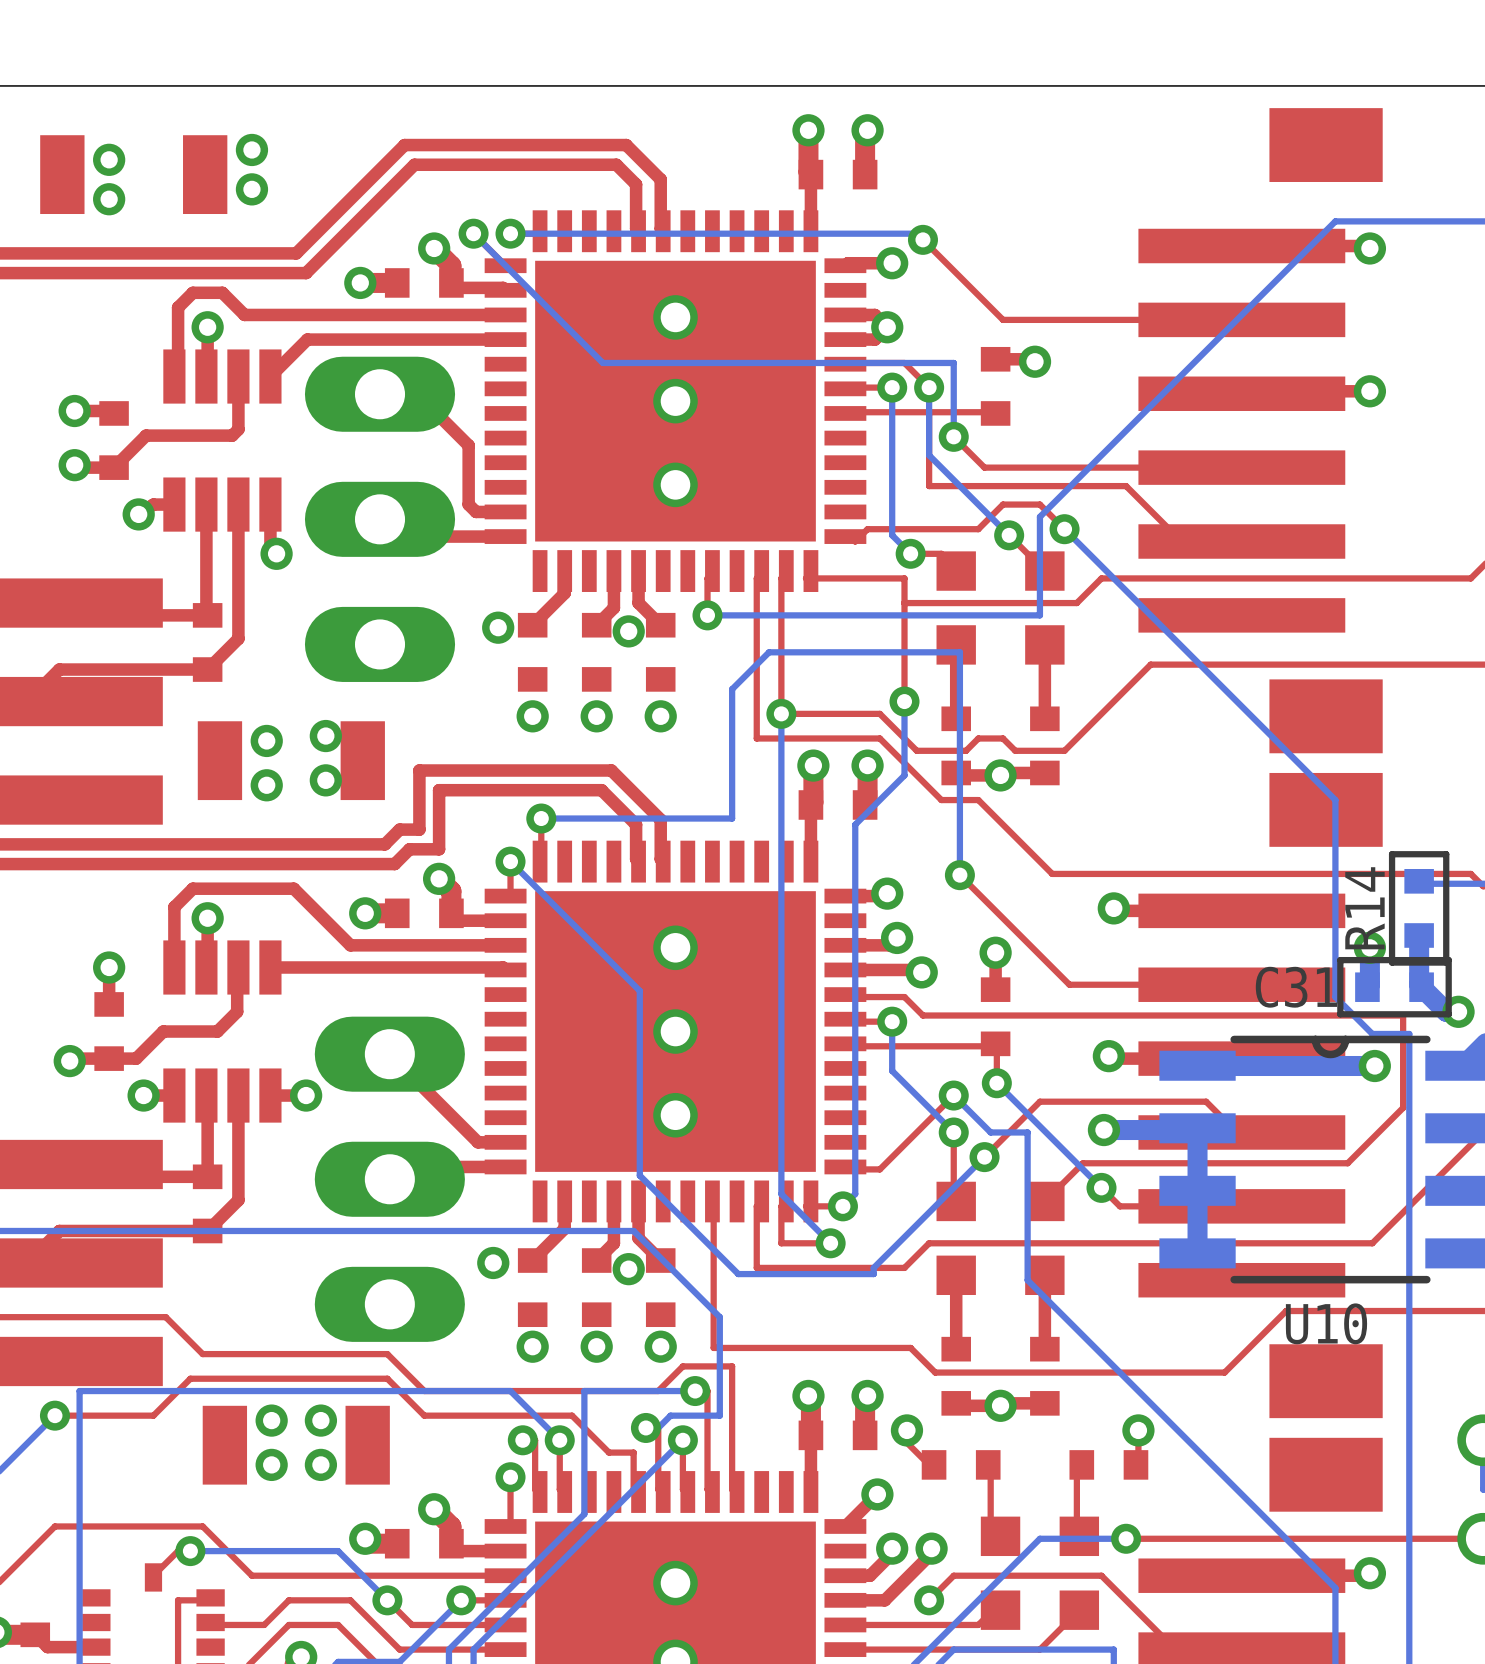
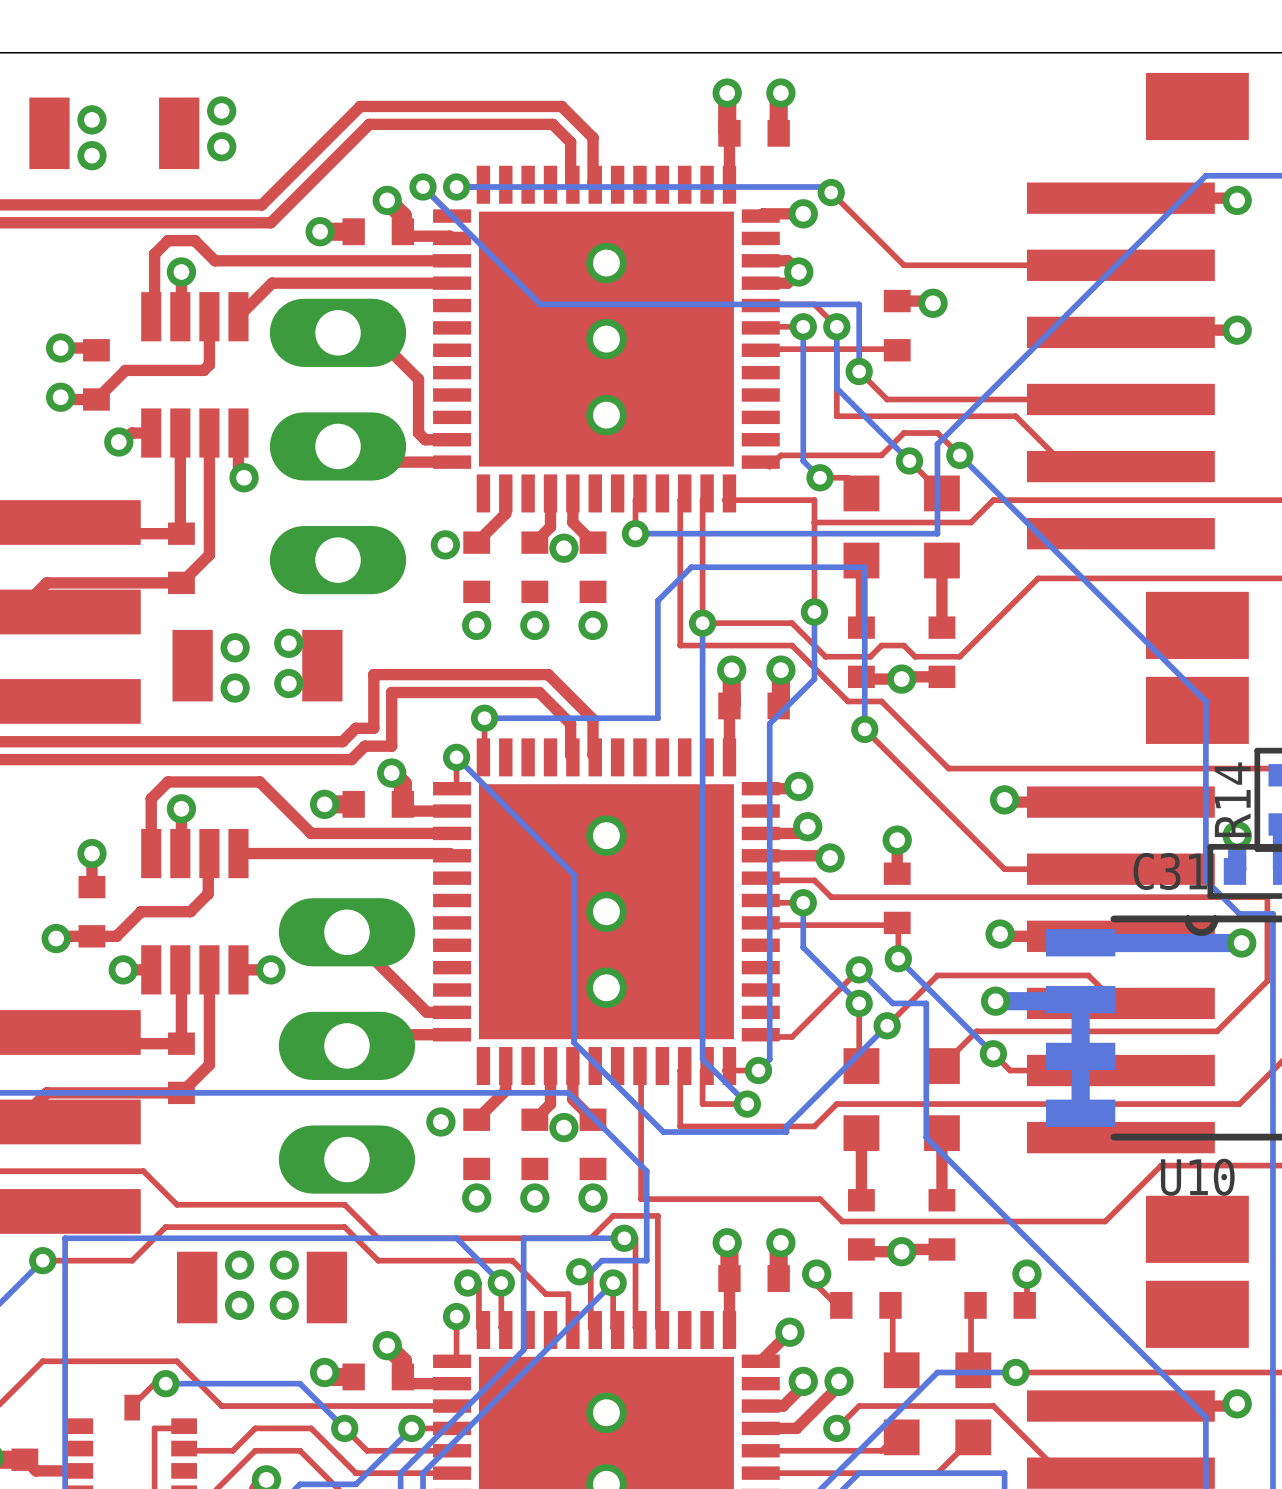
bottom track: (959, 830) (959, 875) -> none
top track: (959, 875) (1069, 984) (1113, 984) -> (864, 729) (1004, 869)
via position: (959, 875) -> (864, 729)

